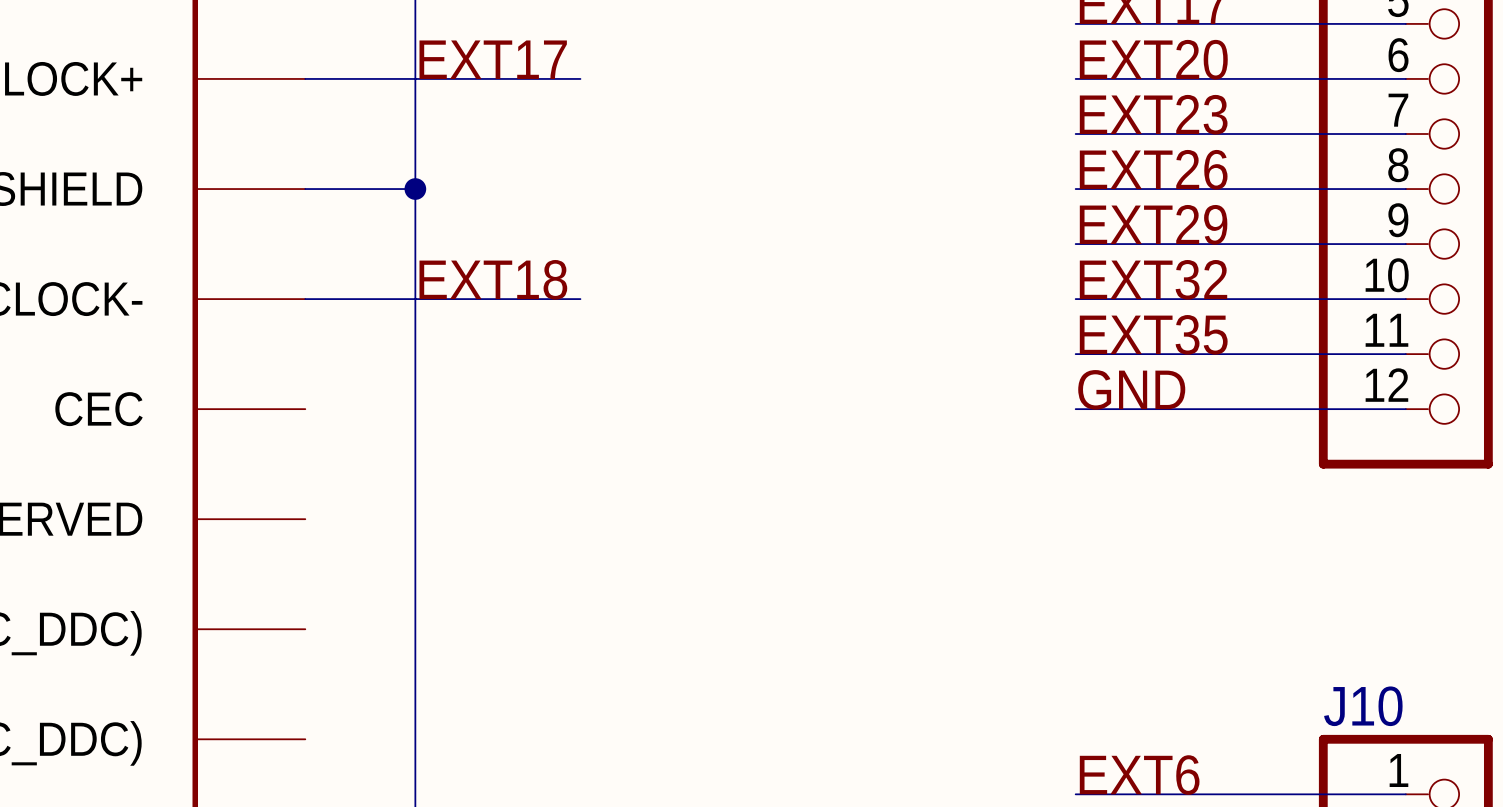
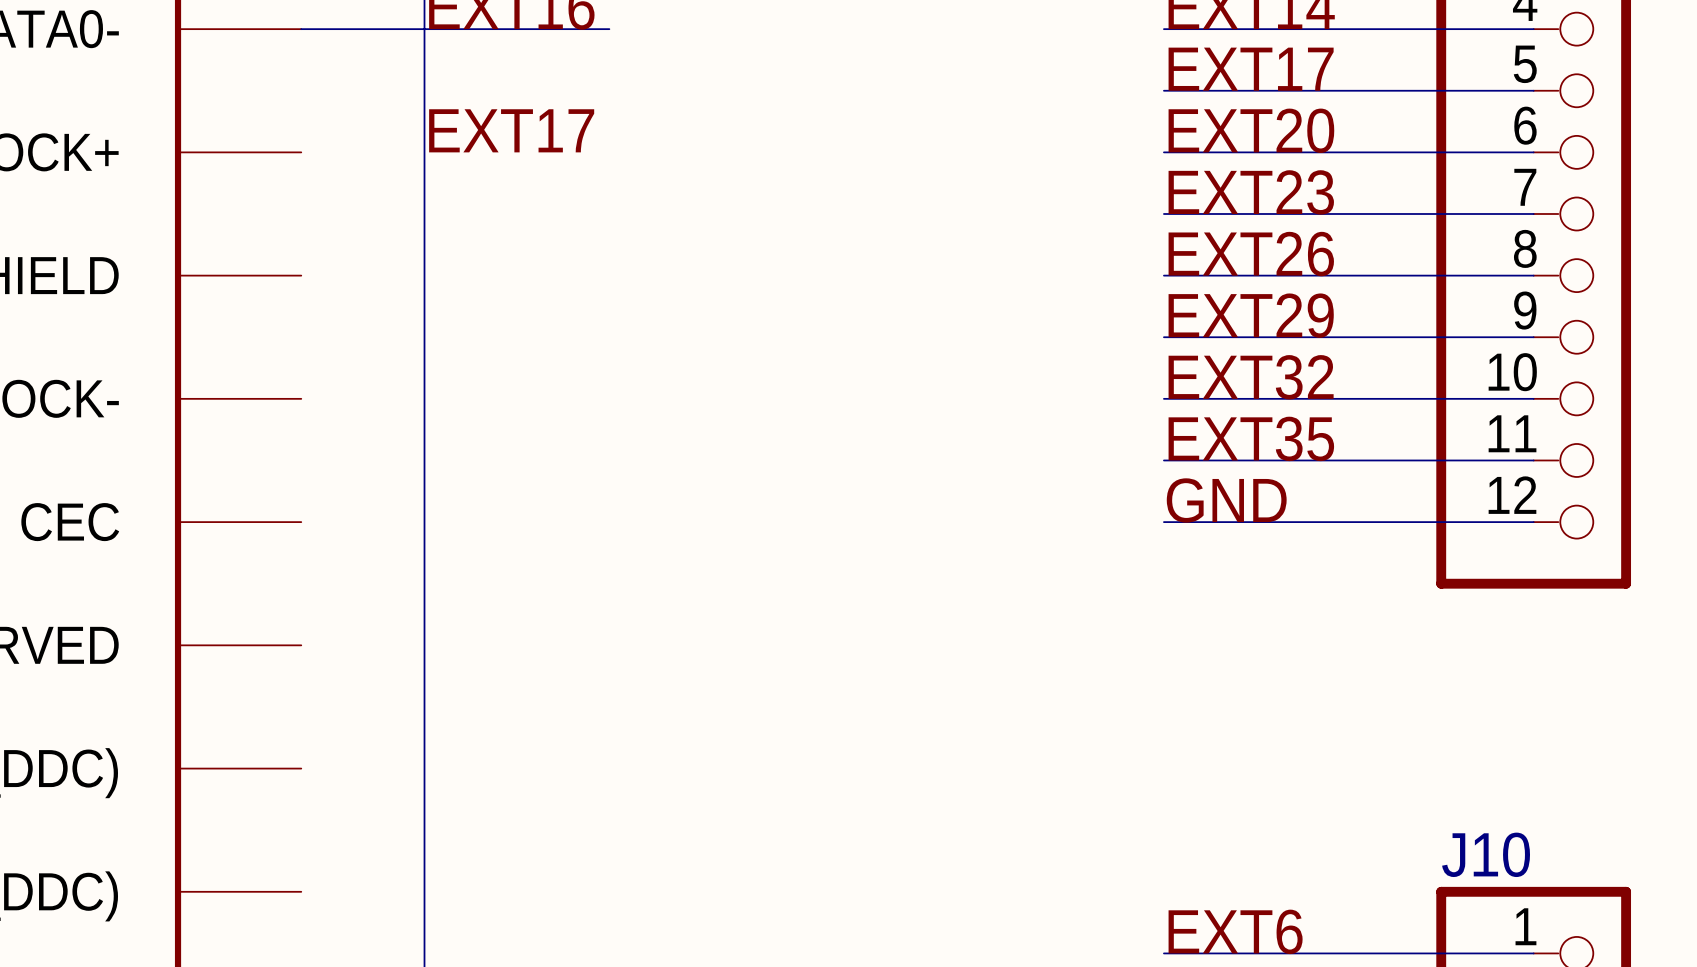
wire: (305, 78) (580, 78) -> none
wire: (305, 189) (415, 189) -> none
junction: (415, 189) -> none
label: EXT18 (493, 279) -> none
wire: (305, 299) (580, 299) -> none

